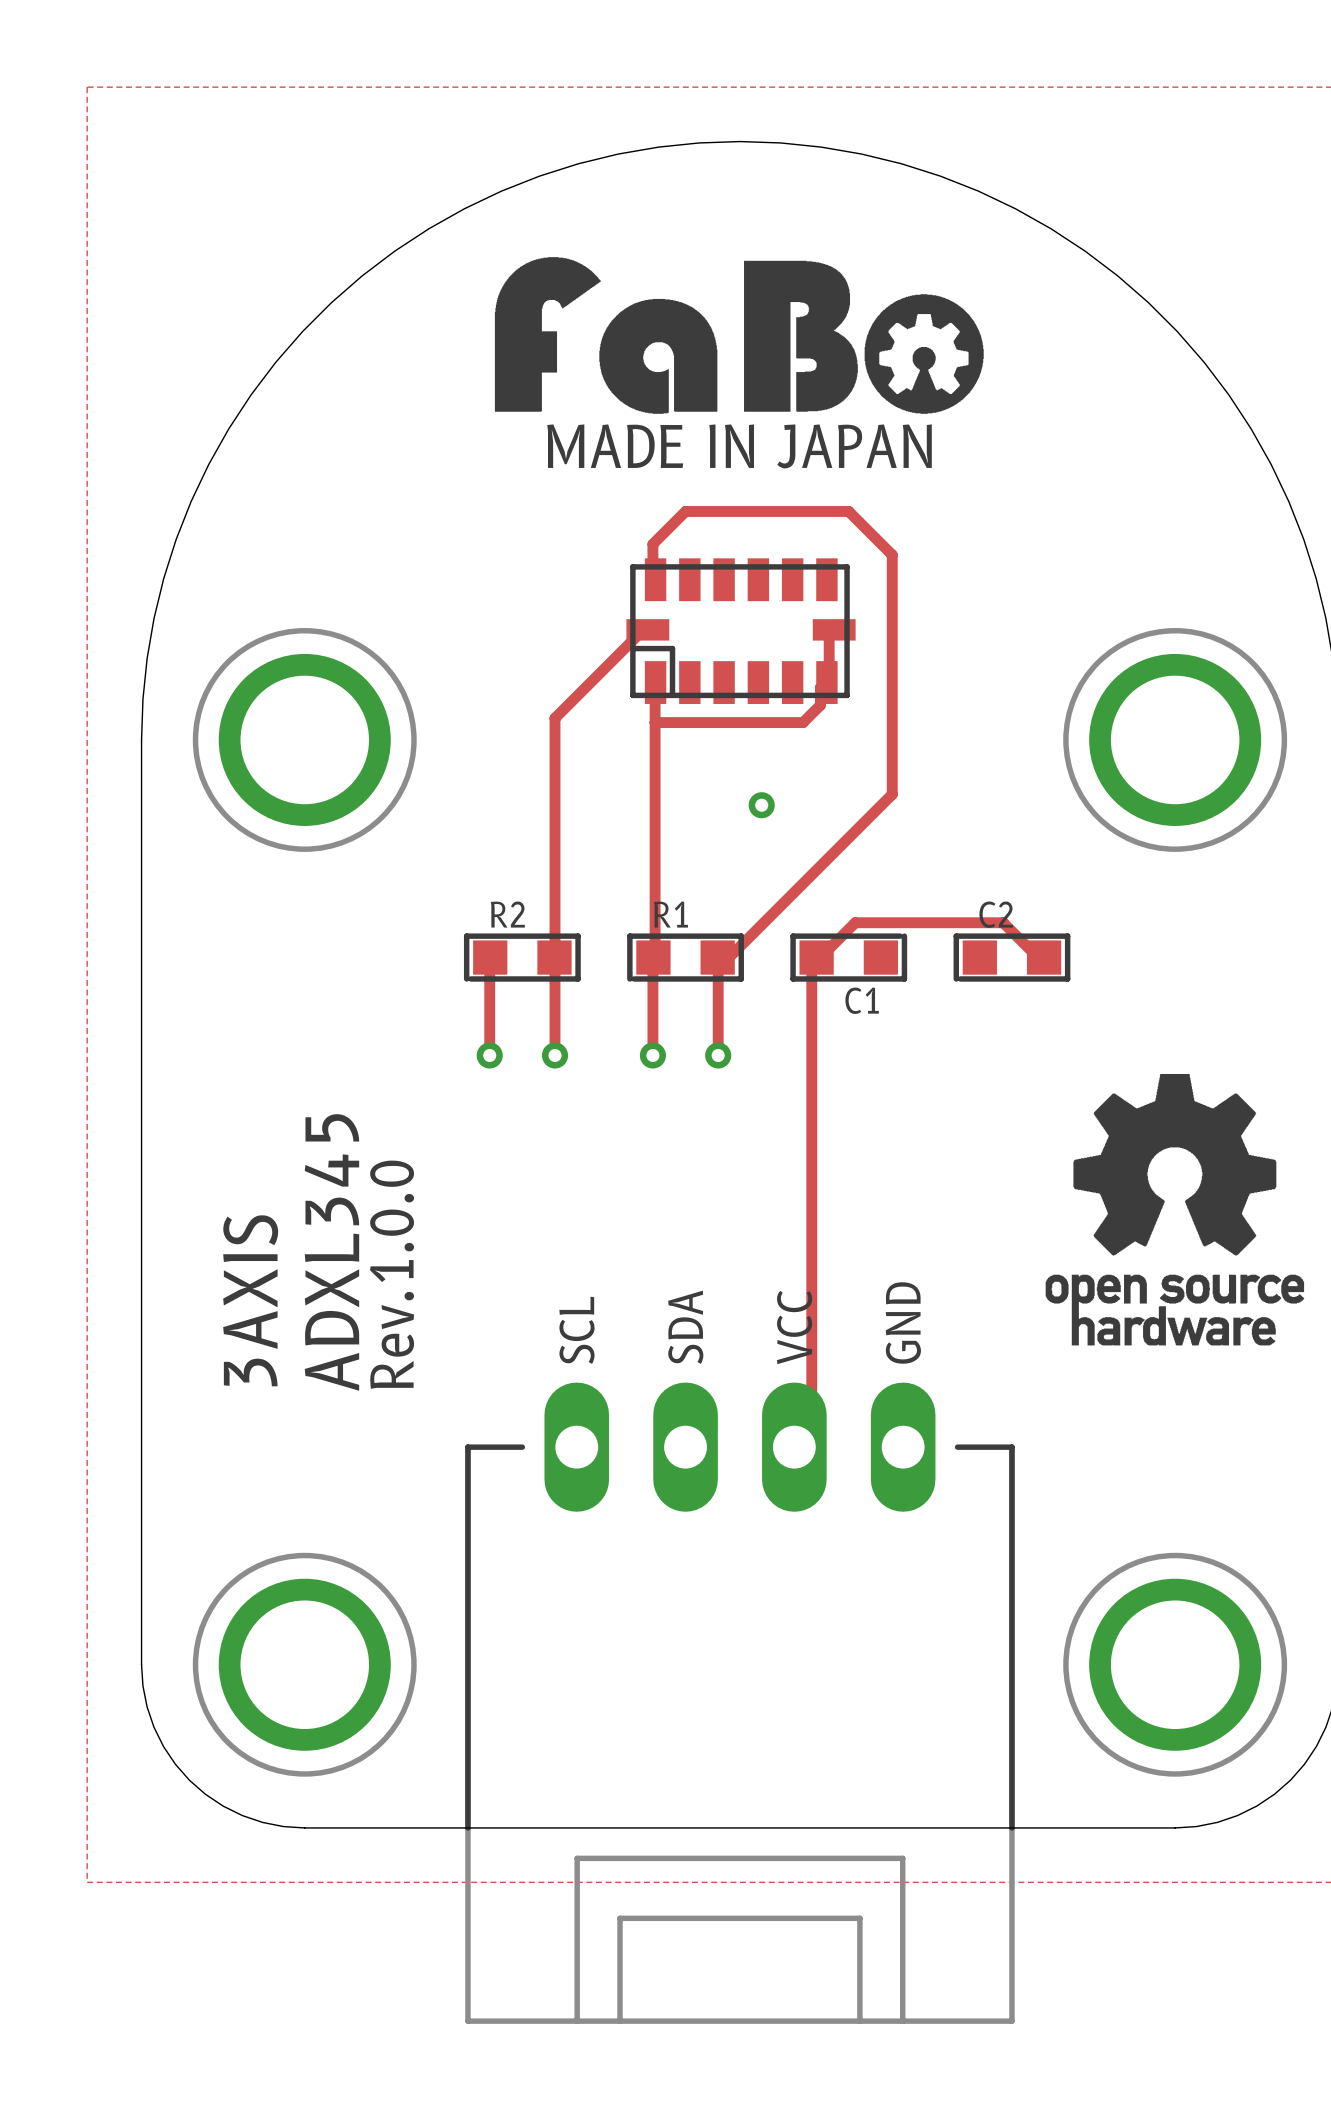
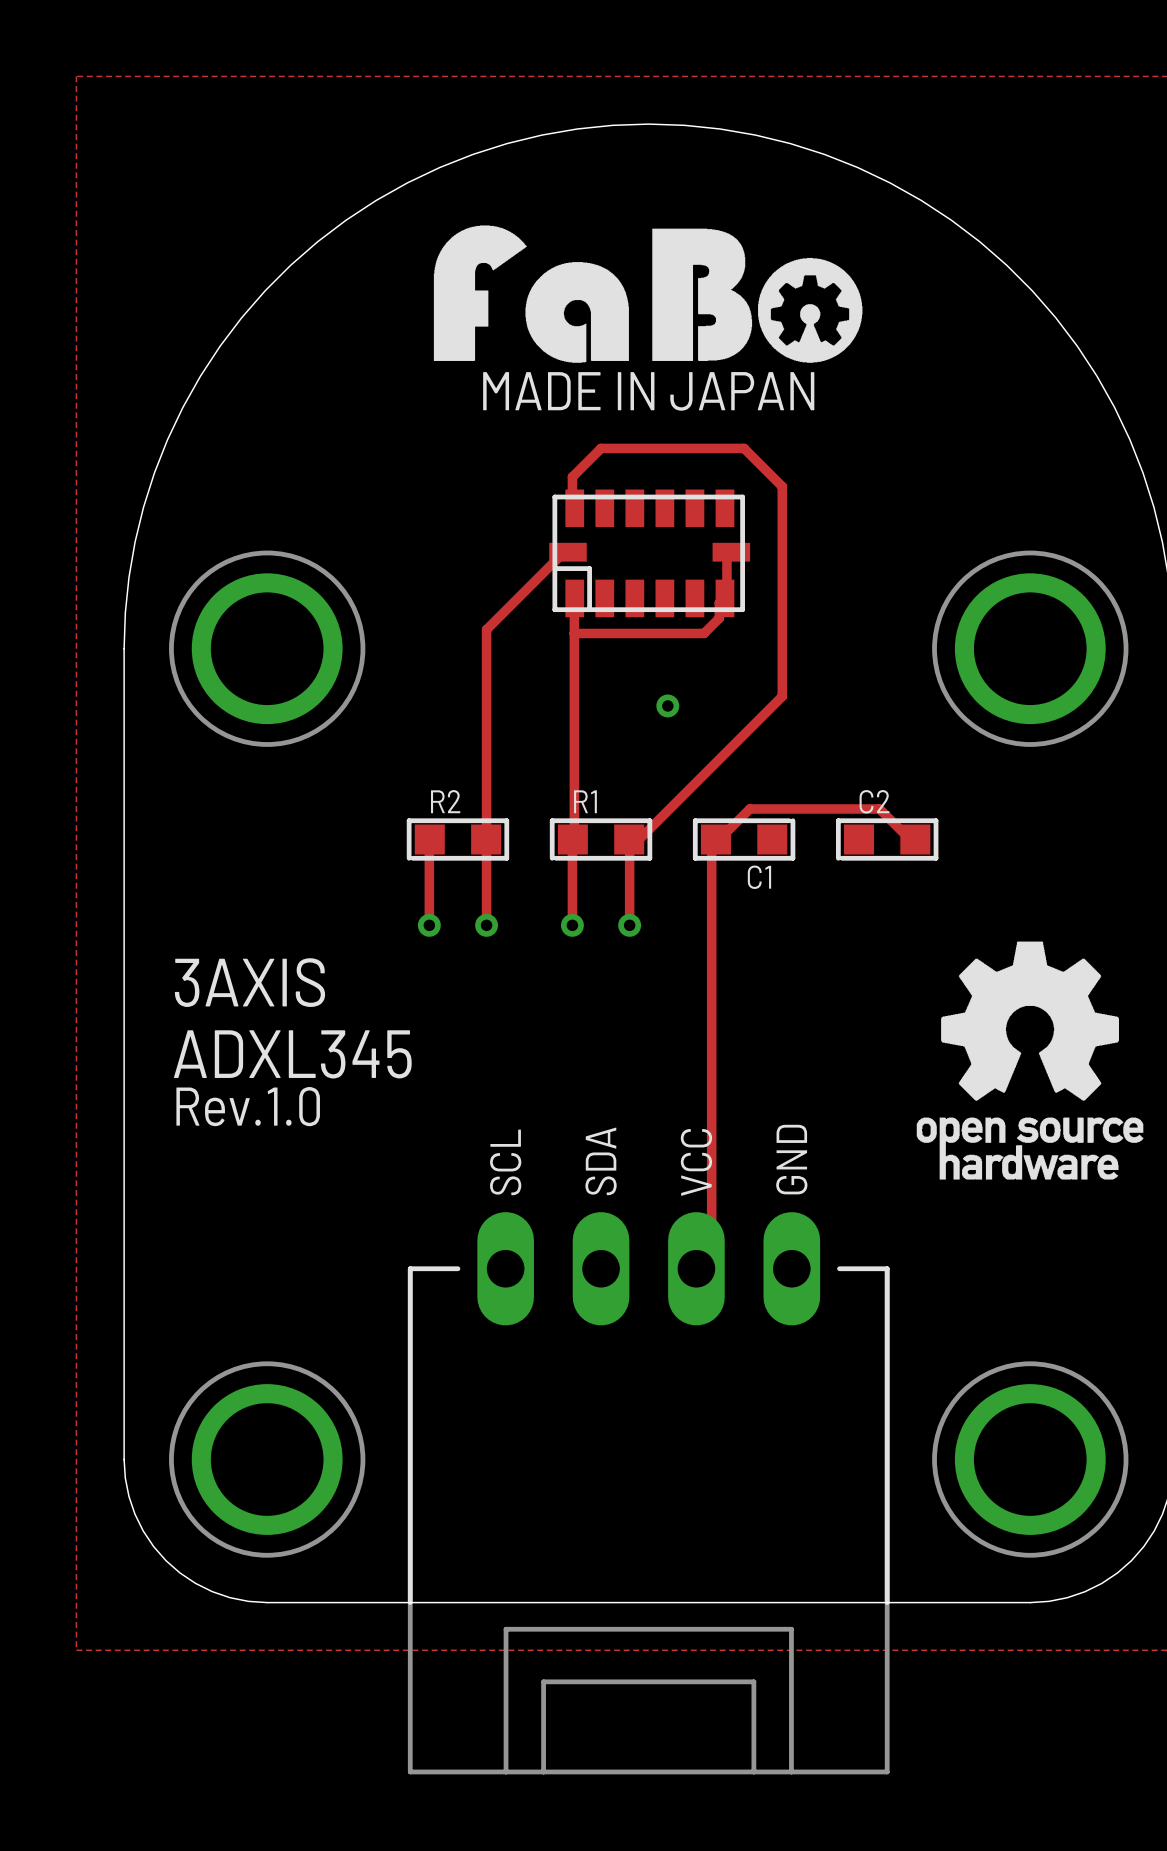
text rotation: 0° (331, 1252) -> 90° clockwise (292, 1054)
text: Rev.1.0.0 (392, 1274) -> Rev.1.0 (248, 1106)
text rotation: 0° (250, 1300) -> 90° clockwise (249, 982)

